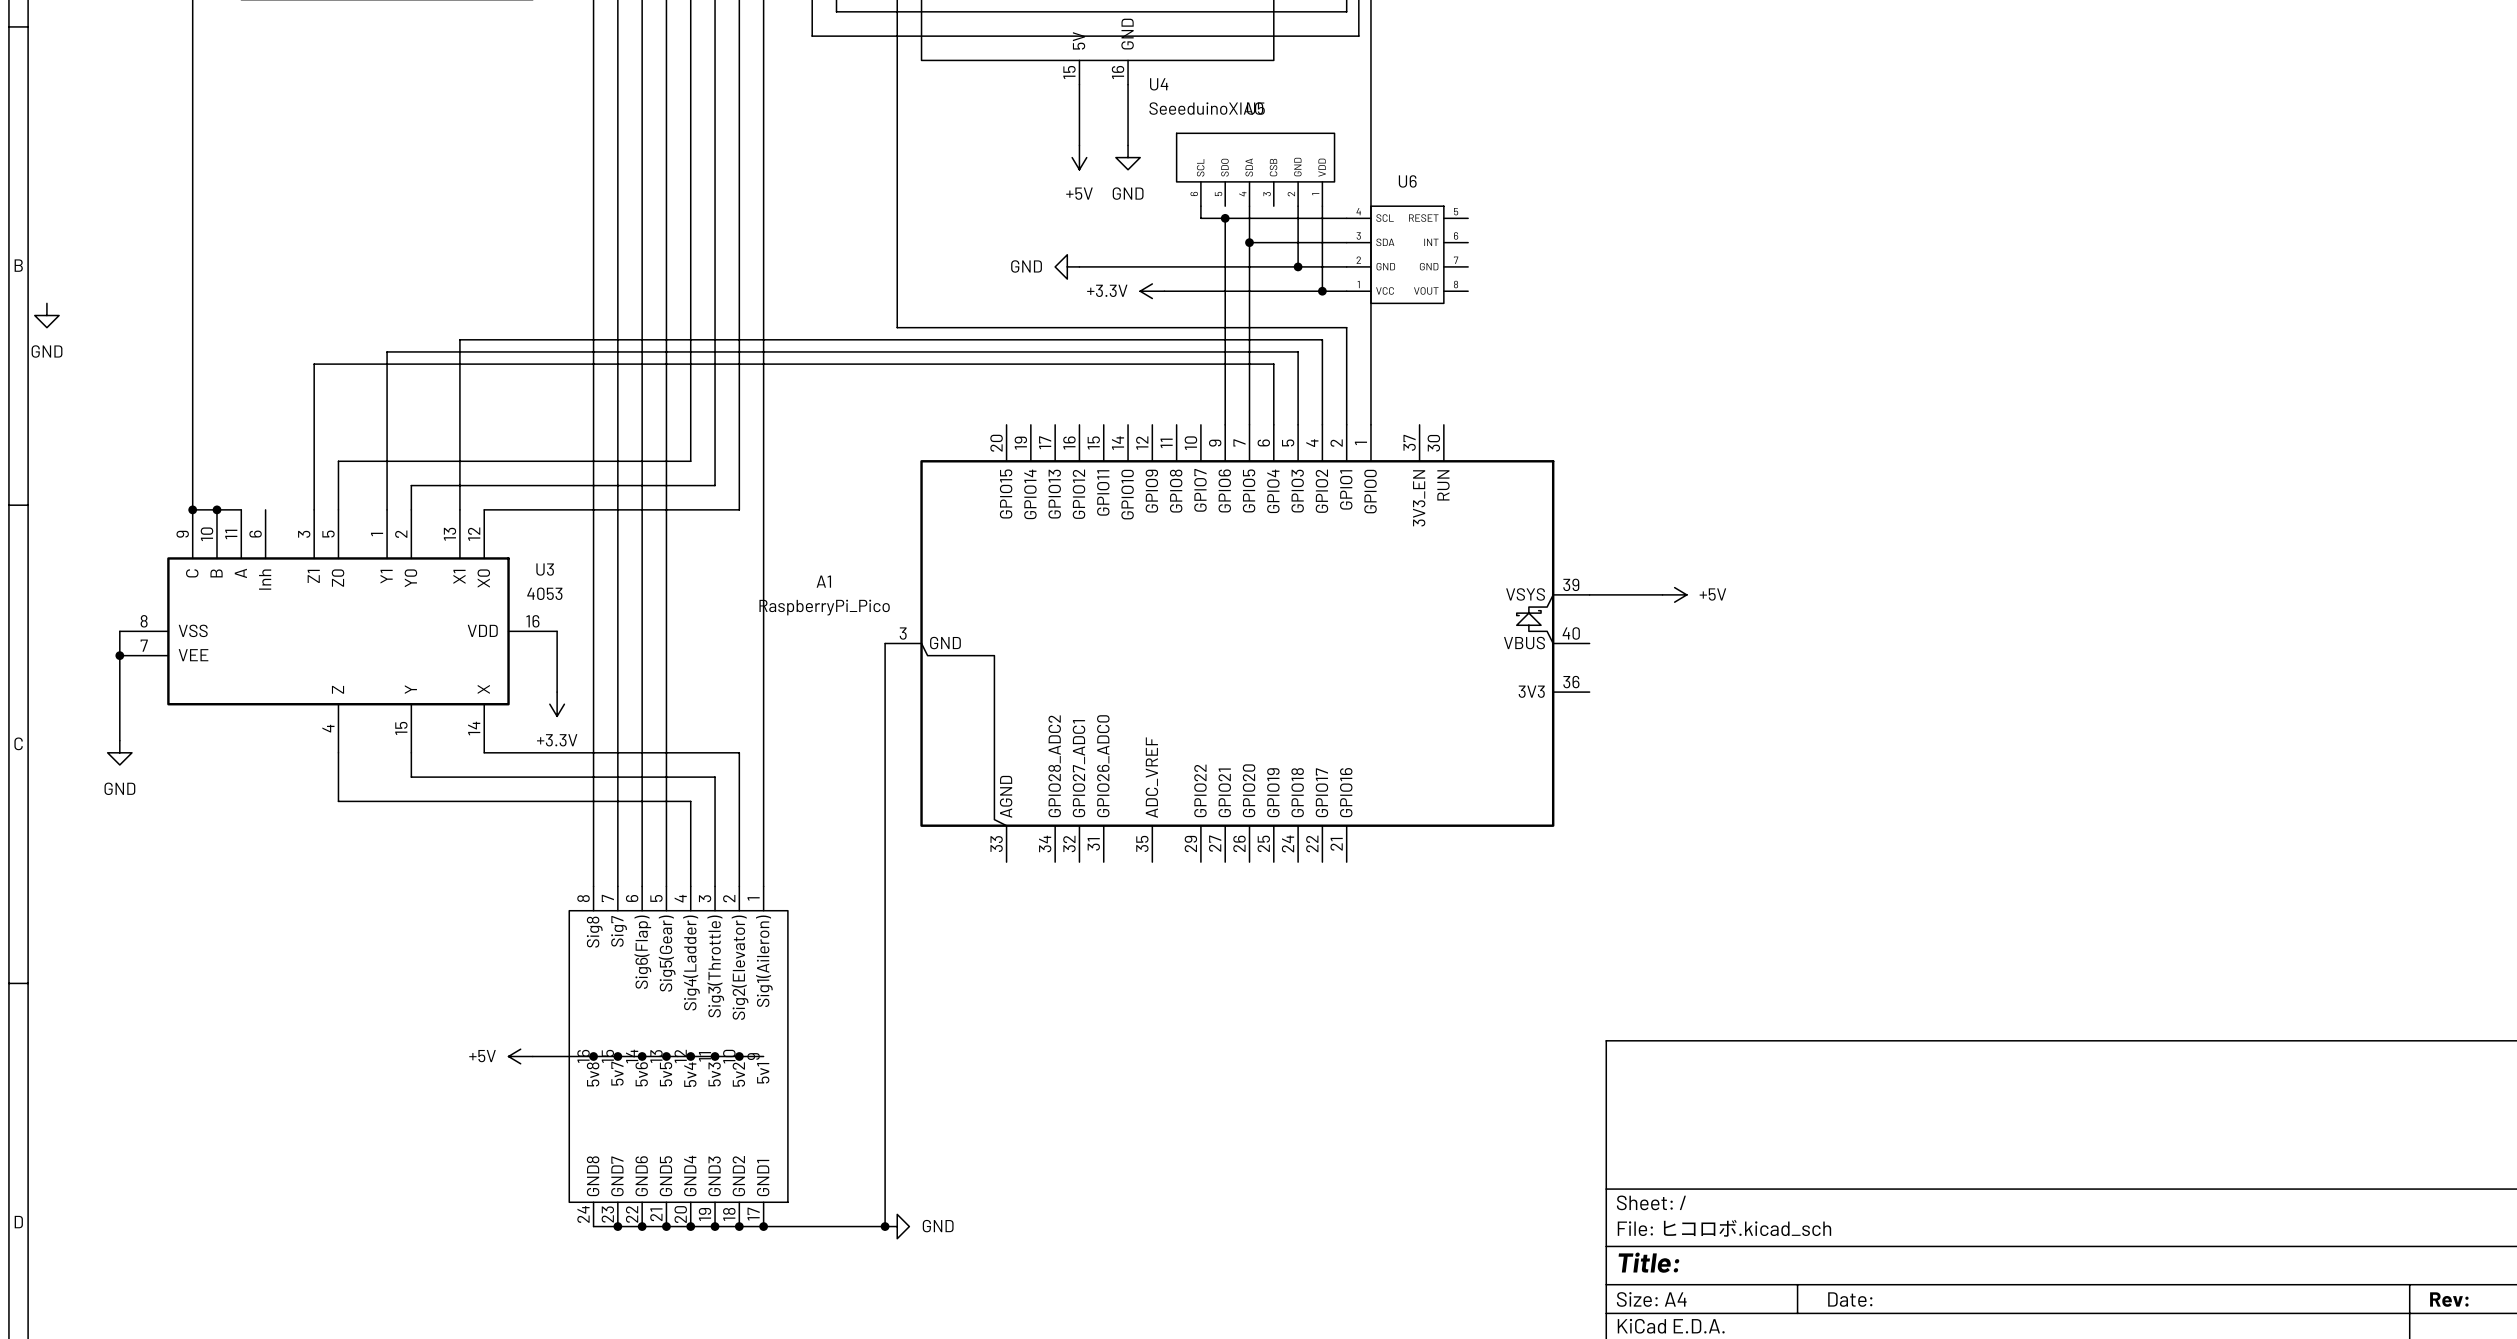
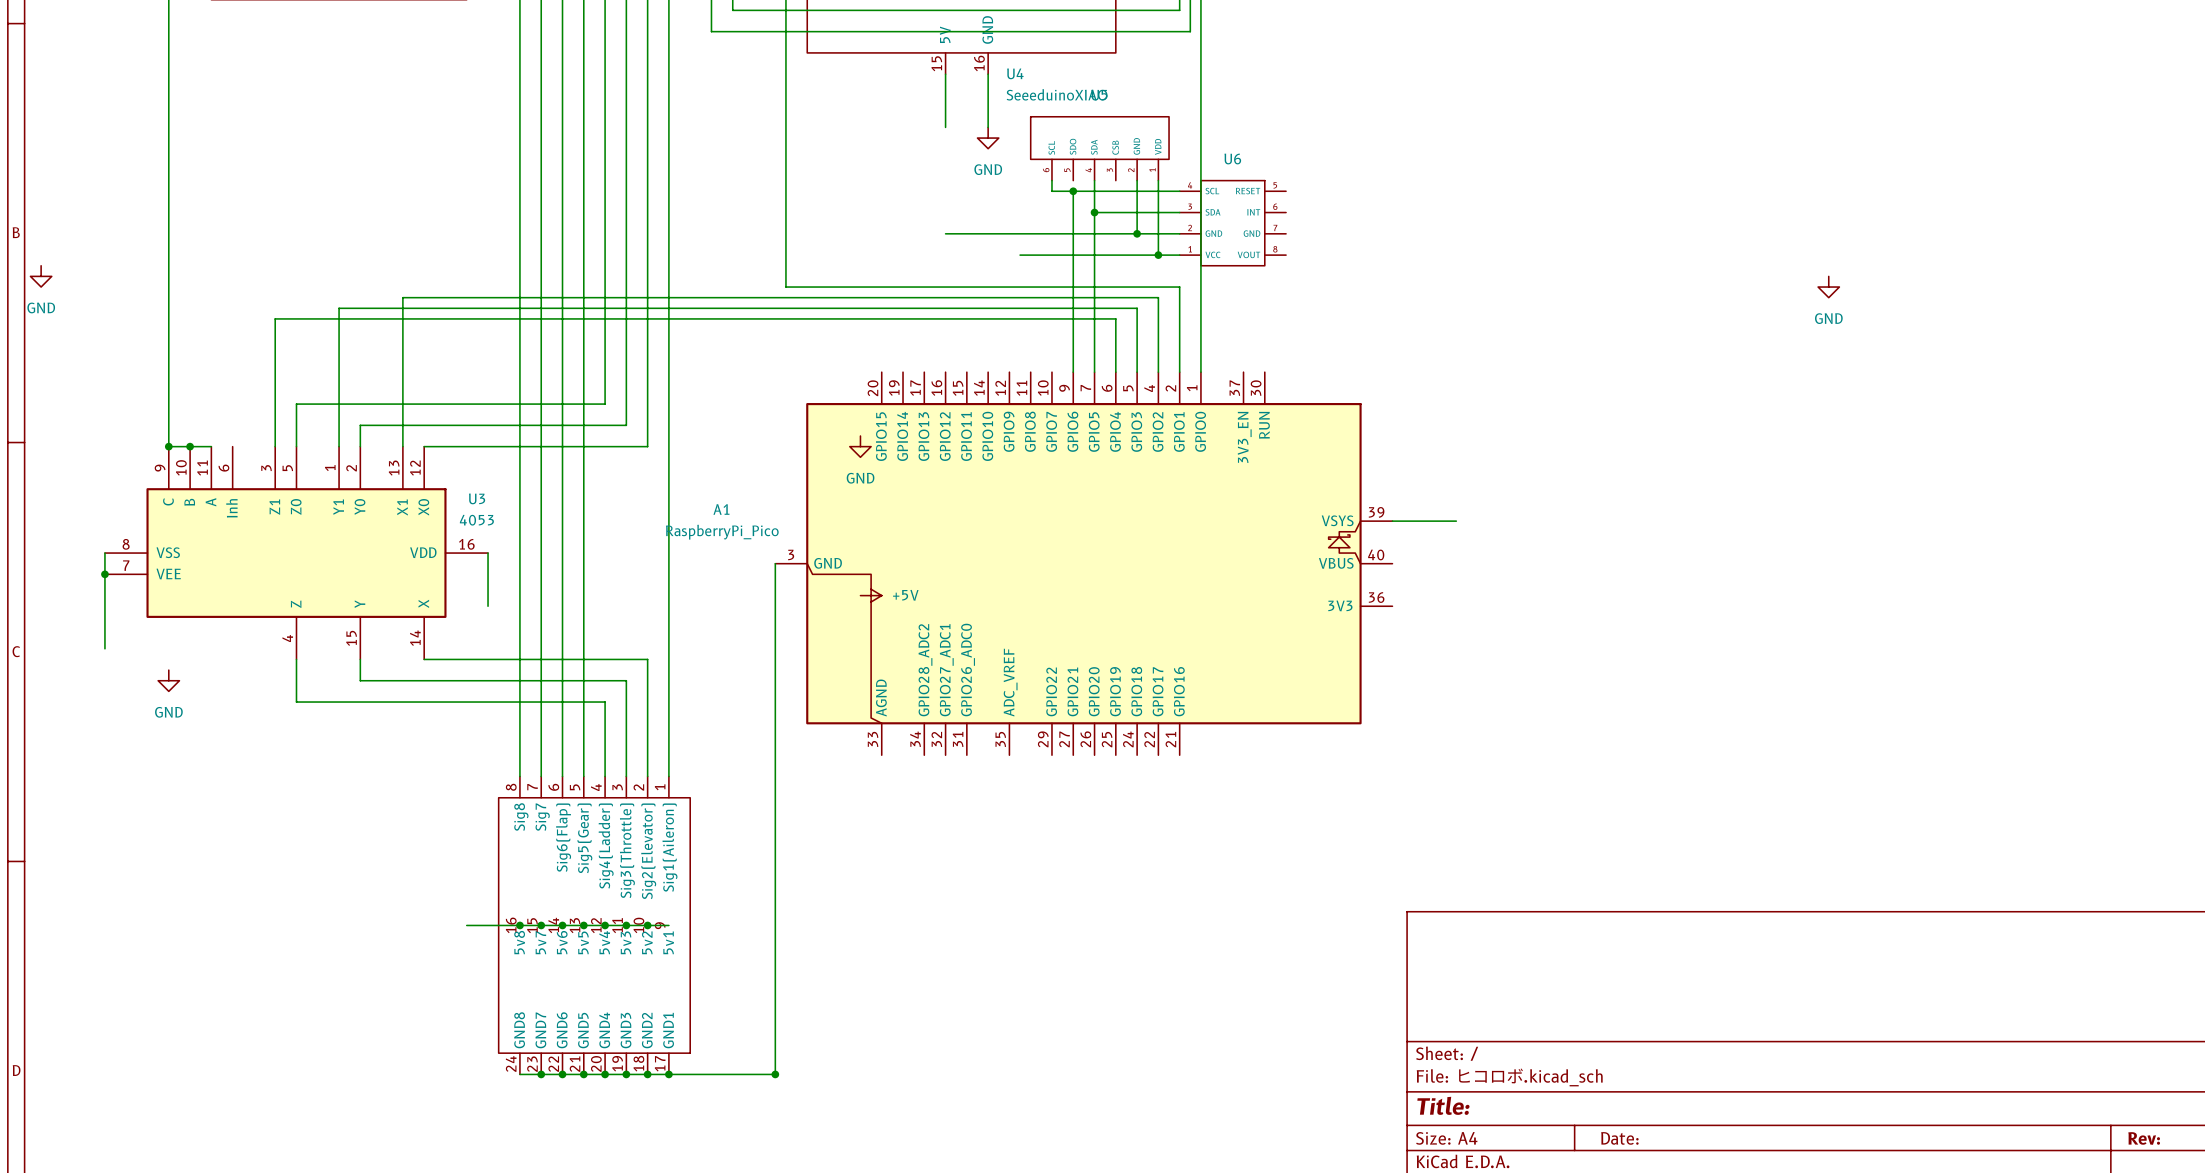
power symbol: +5V (1079, 157) -> none
power symbol: GND (1067, 266) -> none
power symbol: +3.3V (1152, 291) -> none
power symbol: none -> GND (1828, 287)
power symbol: none -> GND (860, 446)
power symbol: +5V (1674, 594) -> none
power symbol: none -> +5V (871, 595)
power symbol: +3.3V (557, 704) -> none
power symbol position: GND (119, 752) -> GND (168, 680)
power symbol: +5V (520, 1056) -> none
power symbol: GND (897, 1226) -> none

